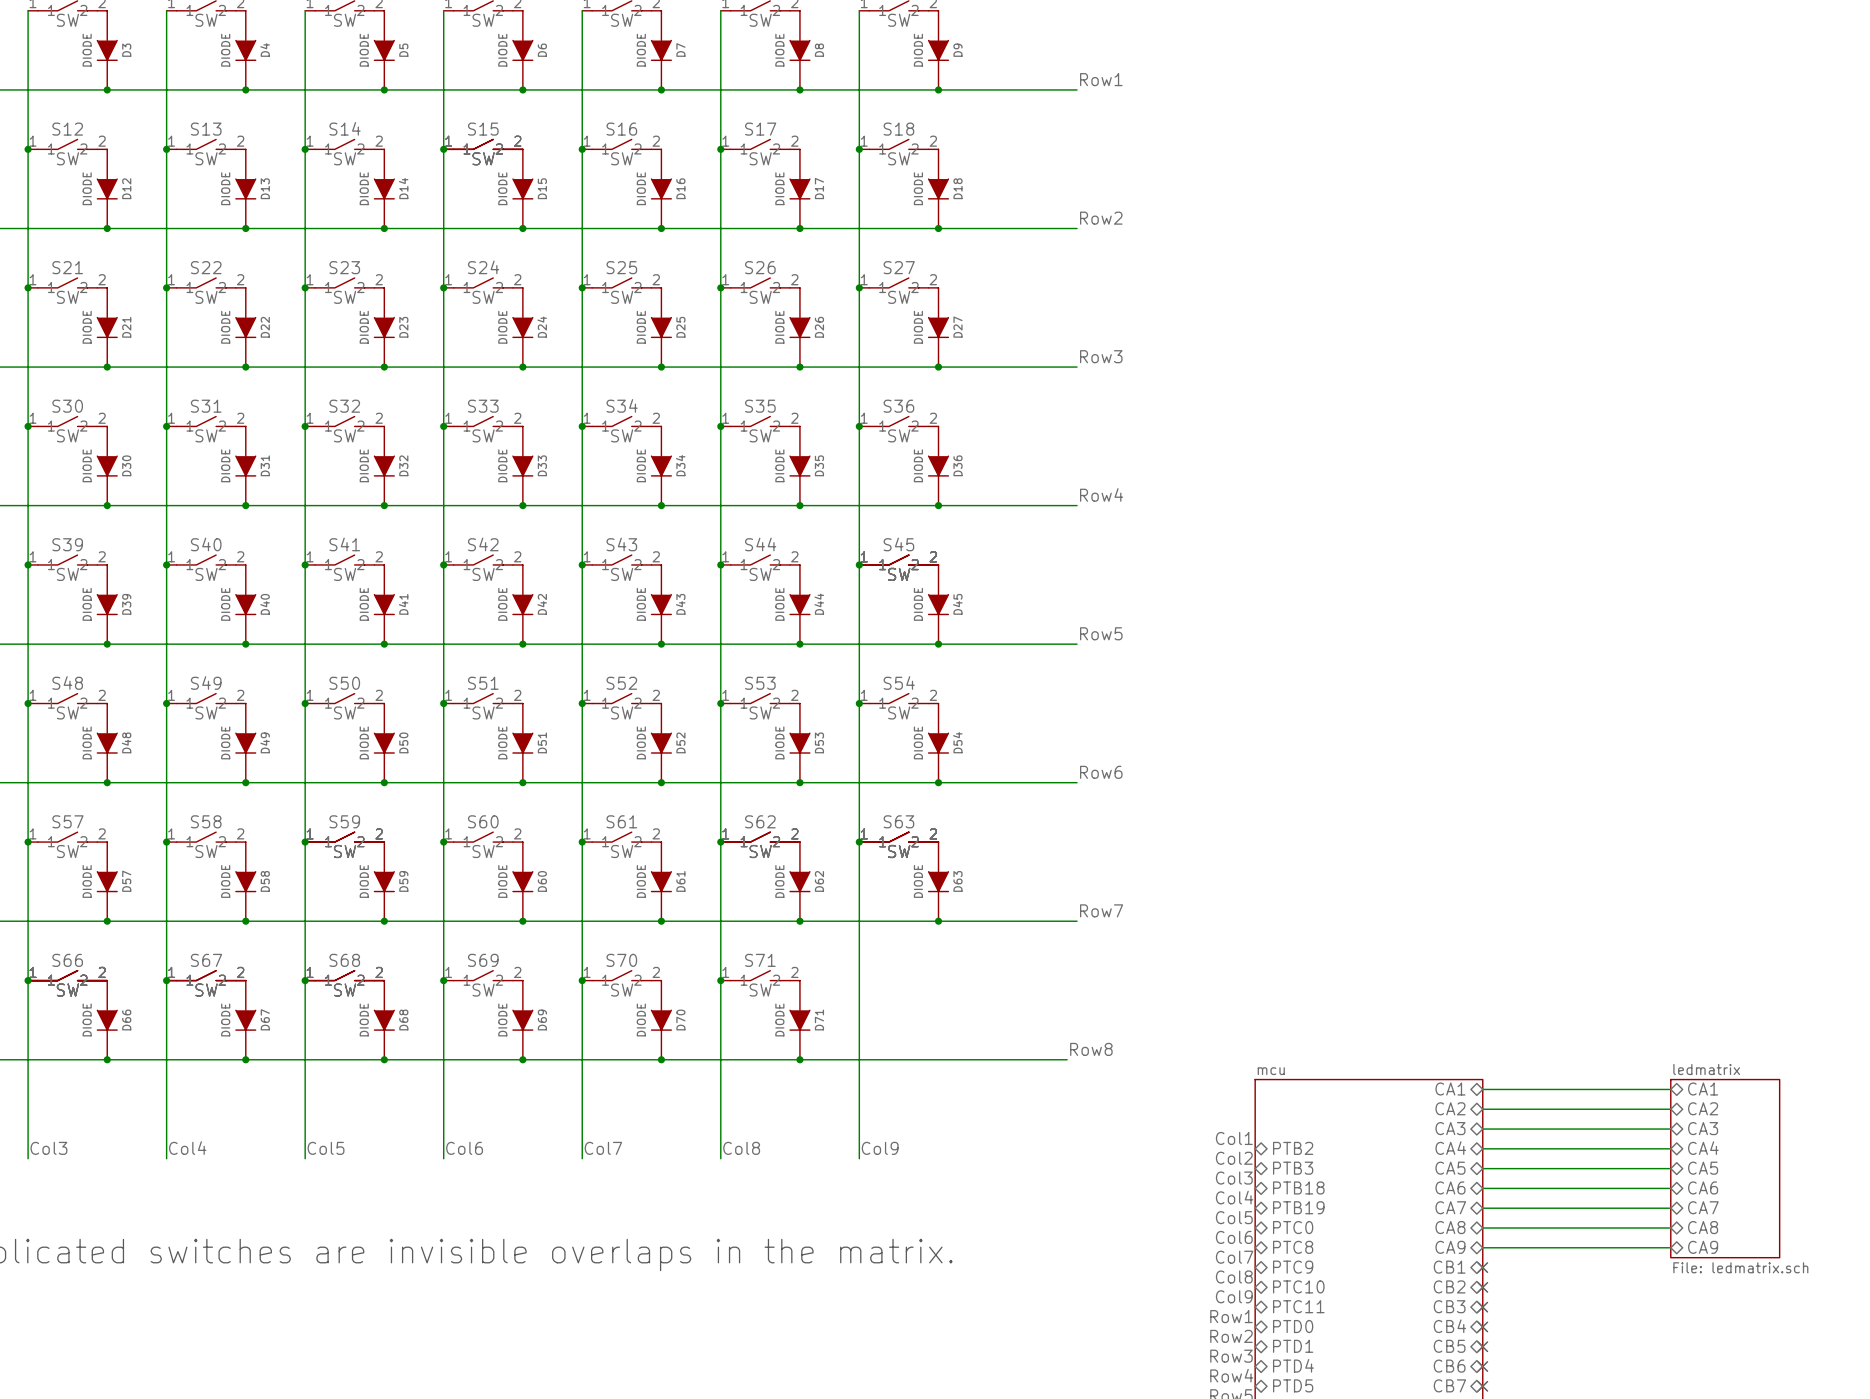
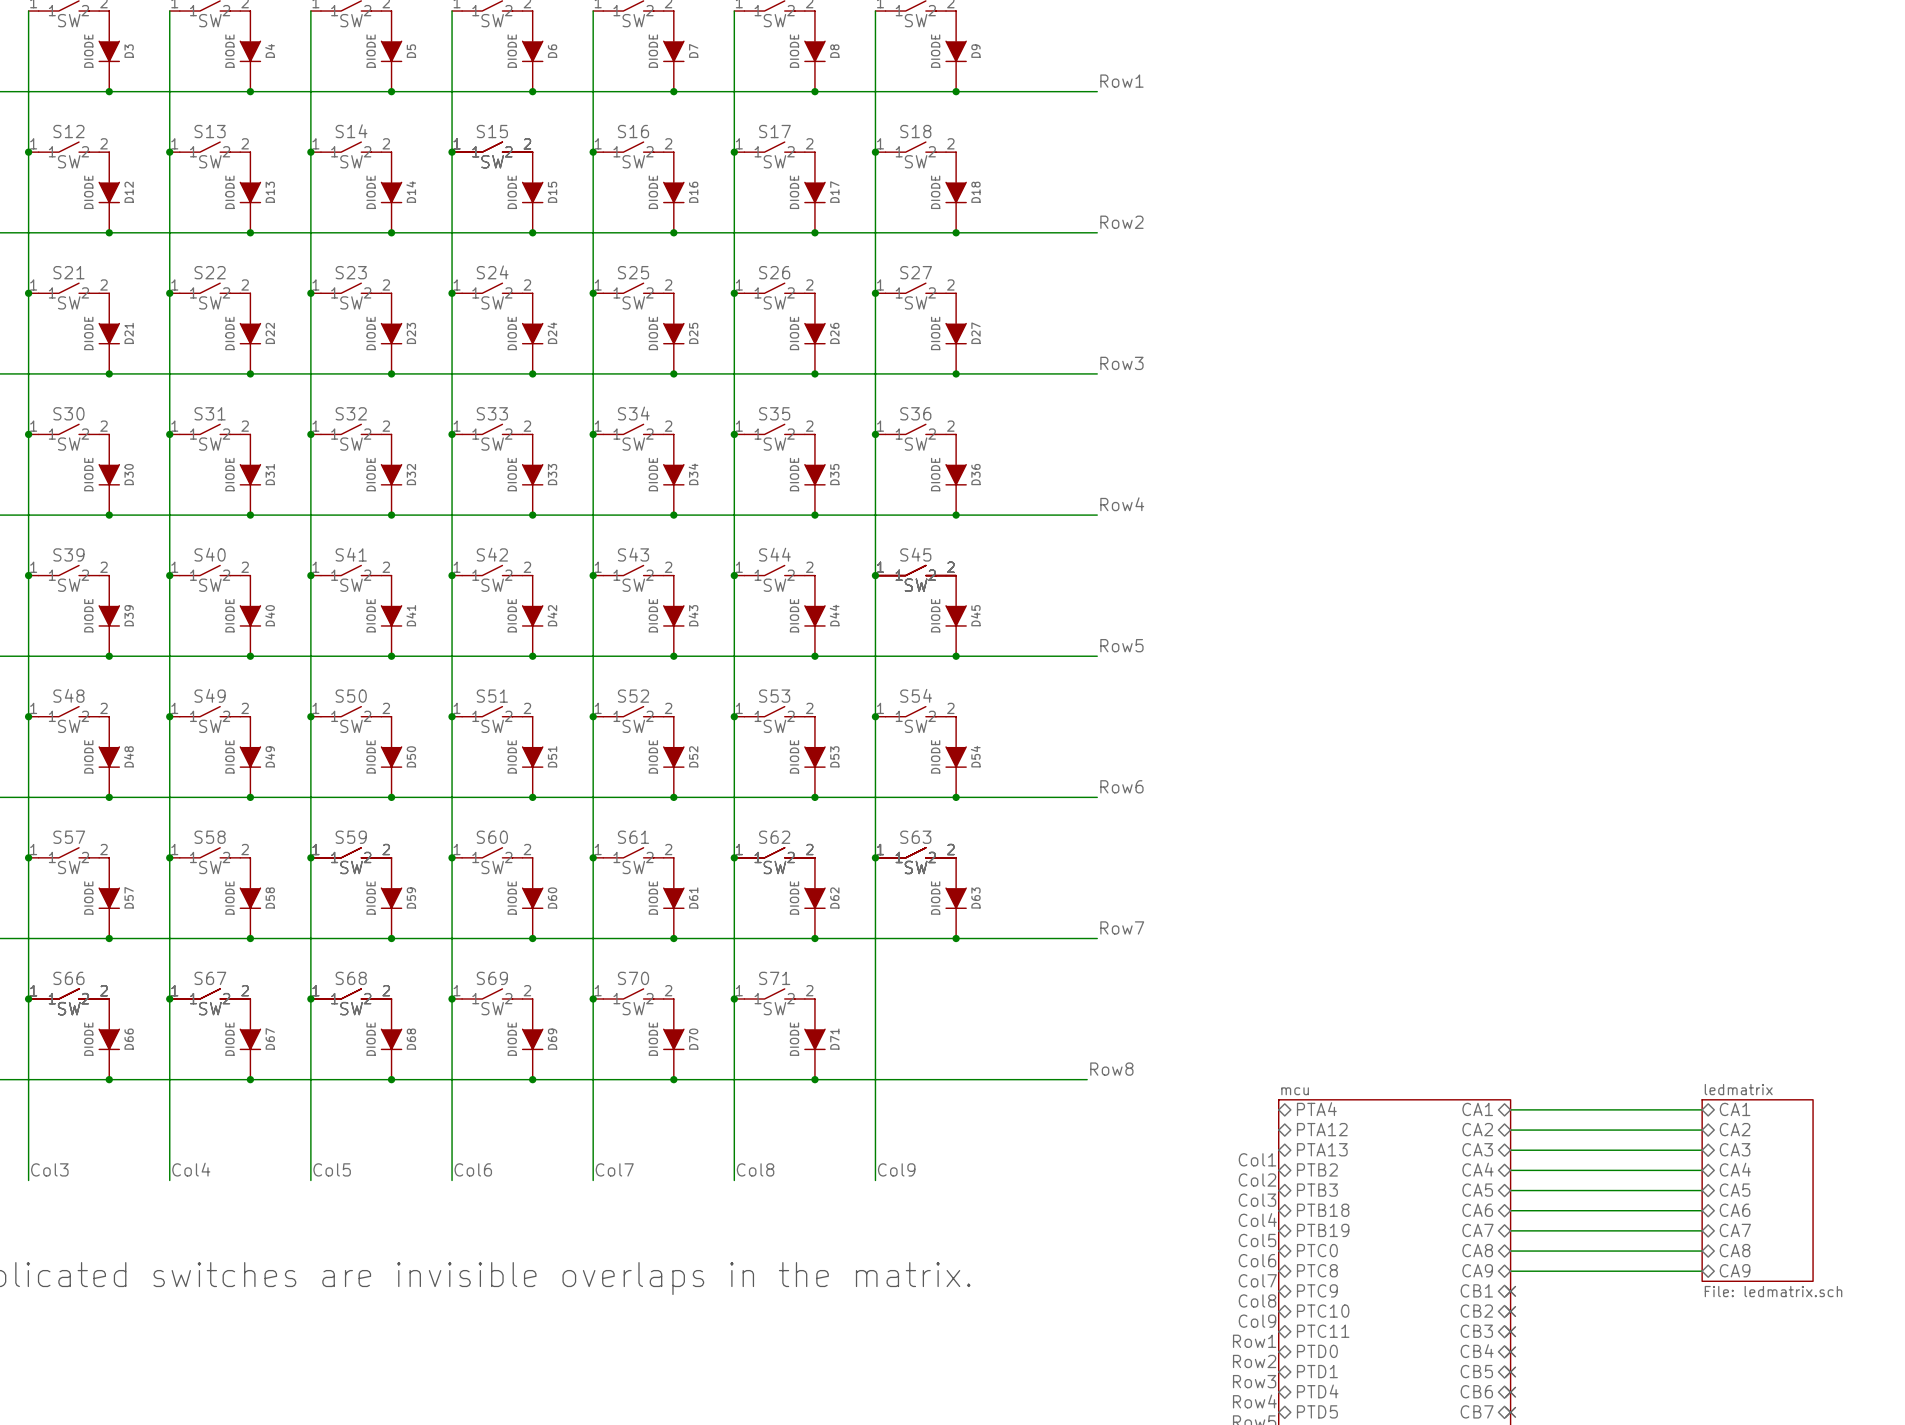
sheet pin: none -> PTA4 (1316, 1109)
sheet pin: none -> PTA12 (1322, 1129)
sheet pin: none -> PTA13 (1322, 1149)

